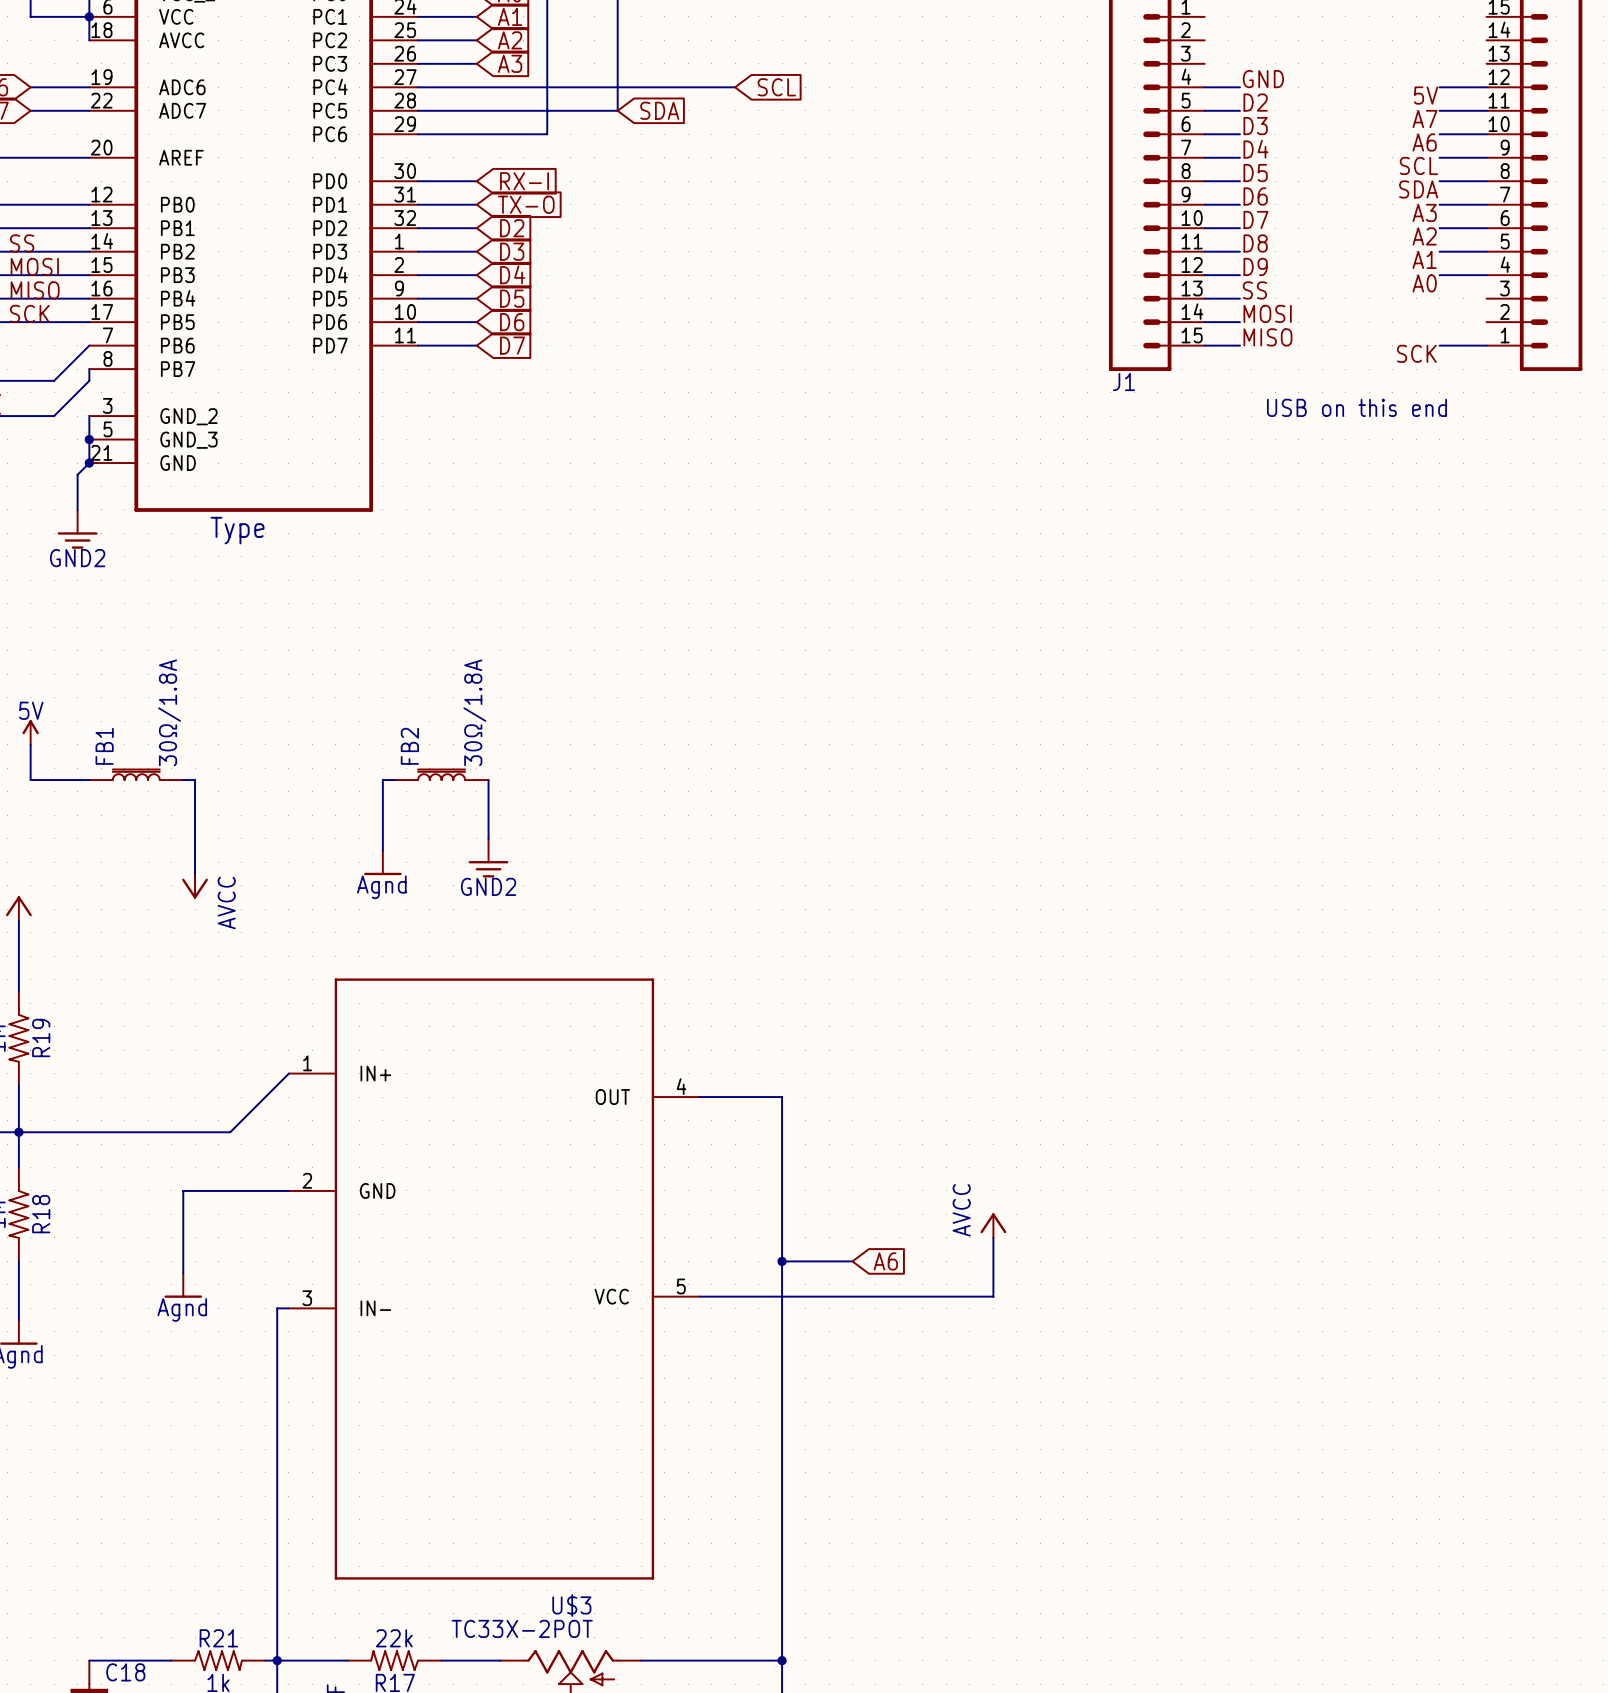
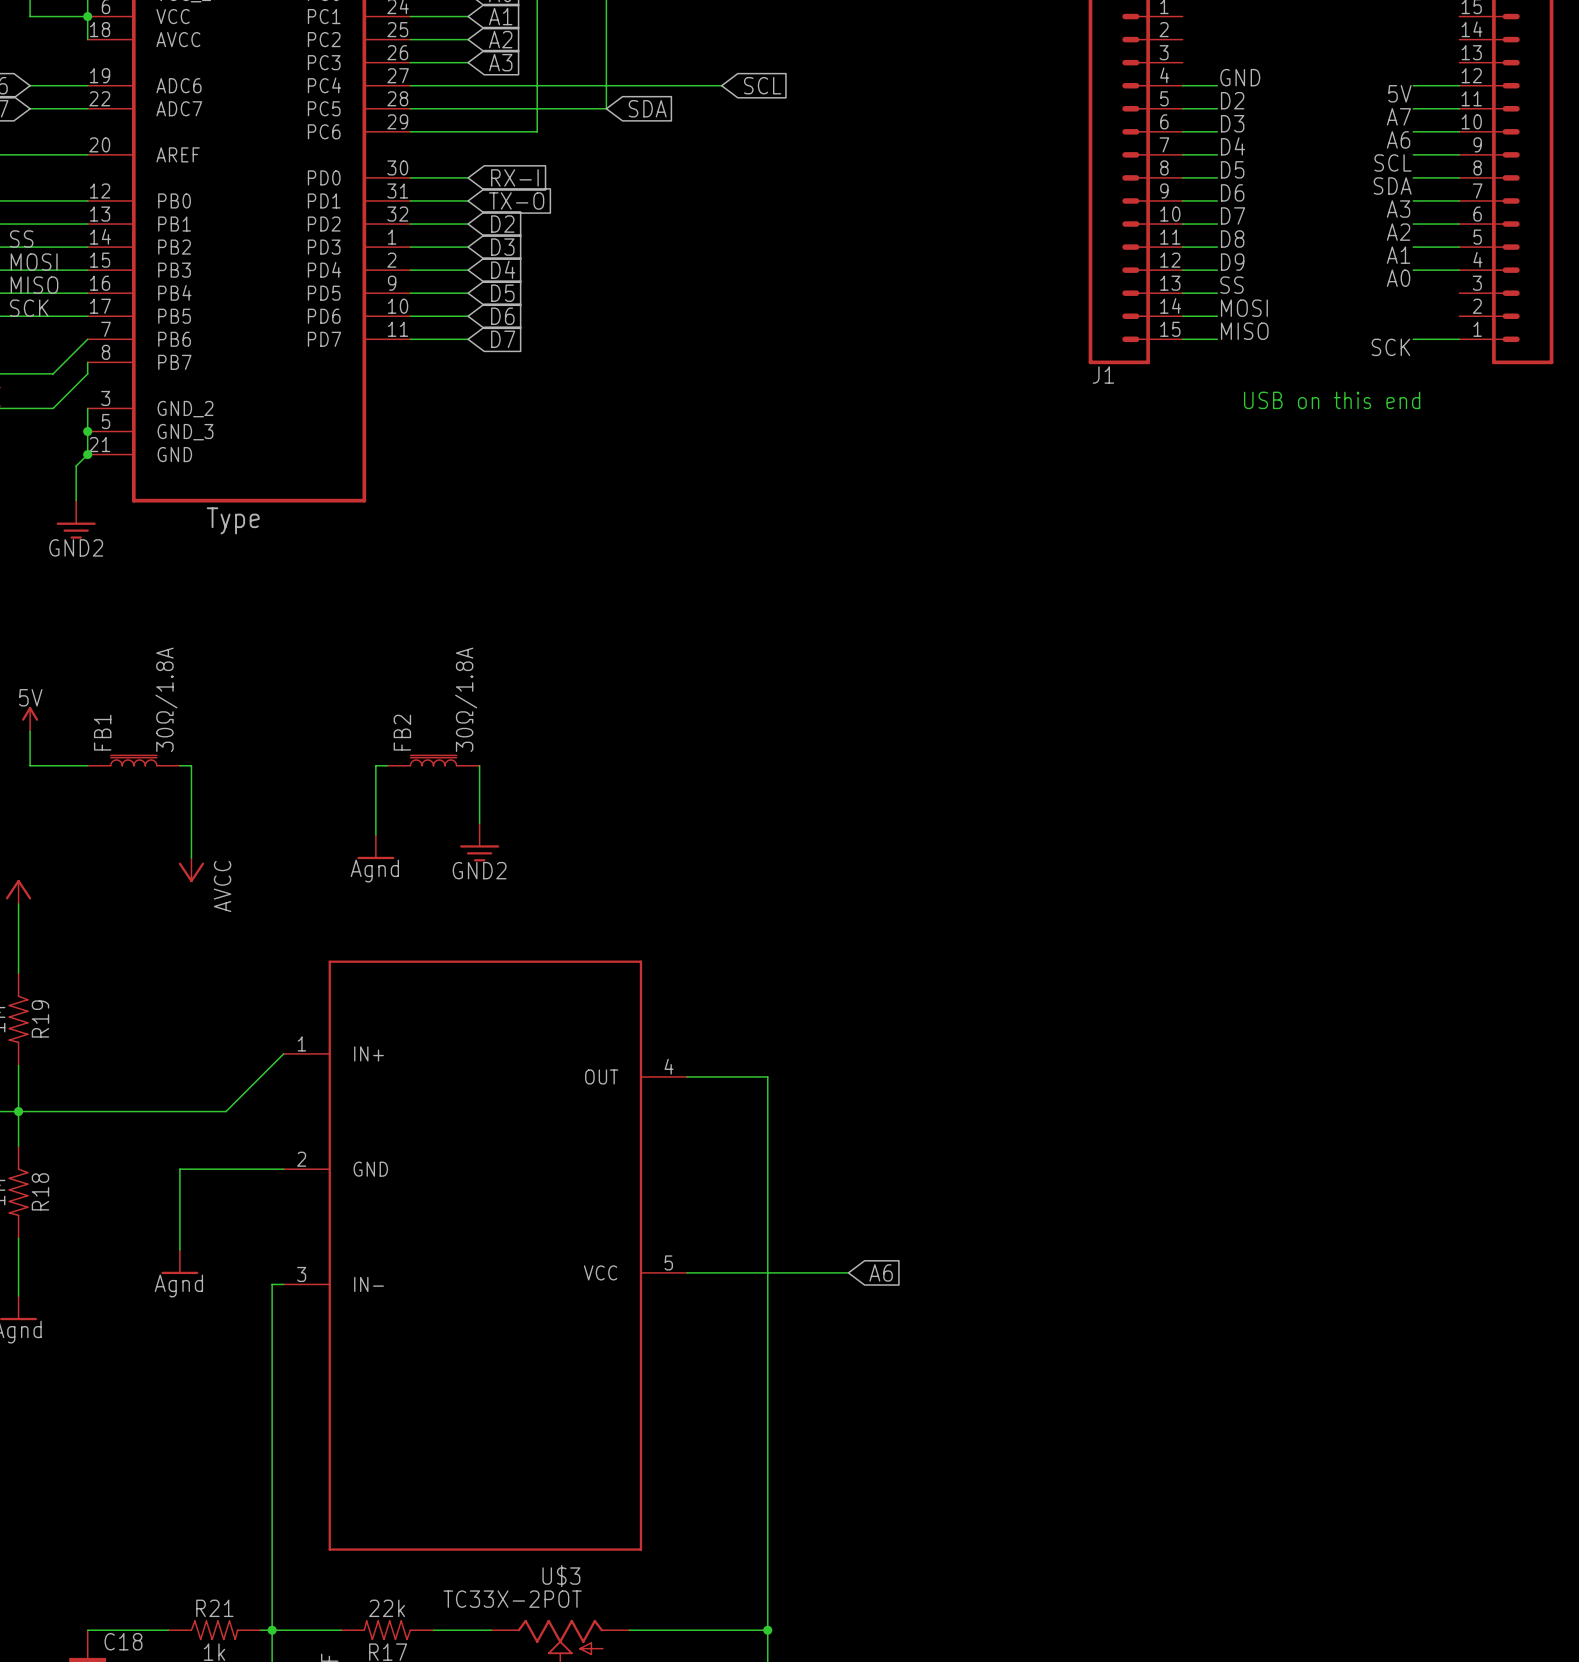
power symbol: AVCC (993, 1225) -> none
wire: (993, 1237) (993, 1296) (864, 1296) -> none
wire: (782, 1261) (852, 1261) -> none
junction: (782, 1261) -> none
global label position: A6 (885, 1261) -> A6 (881, 1272)

